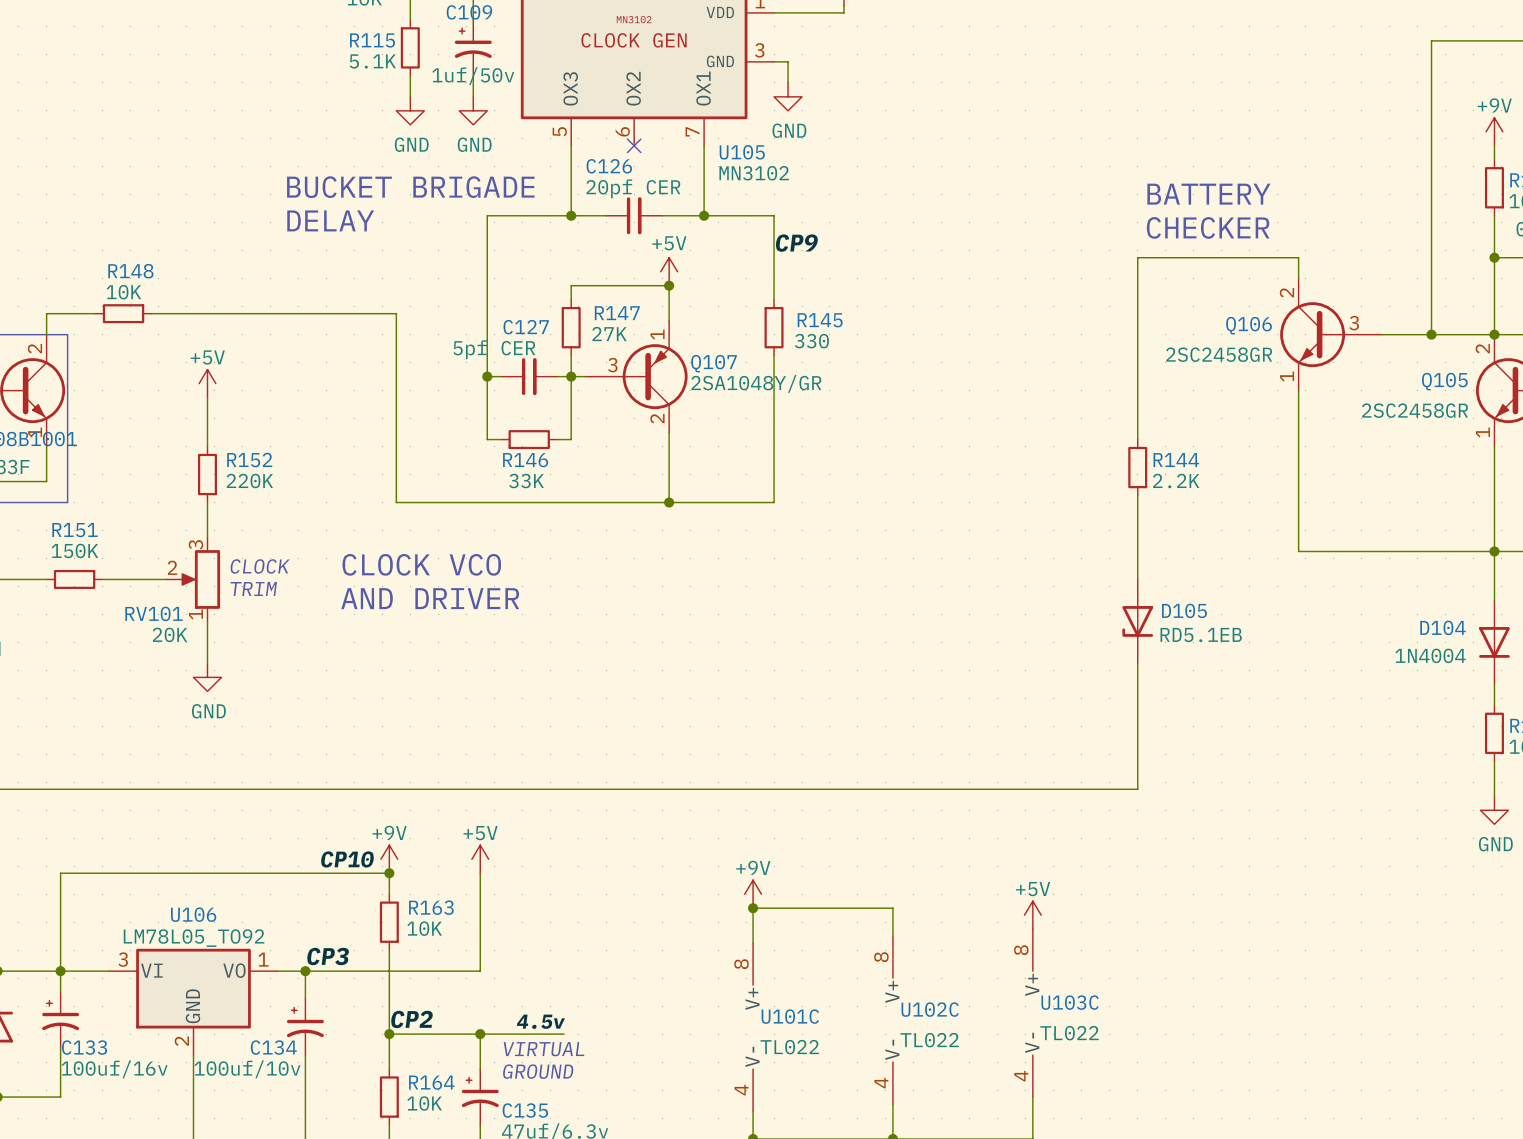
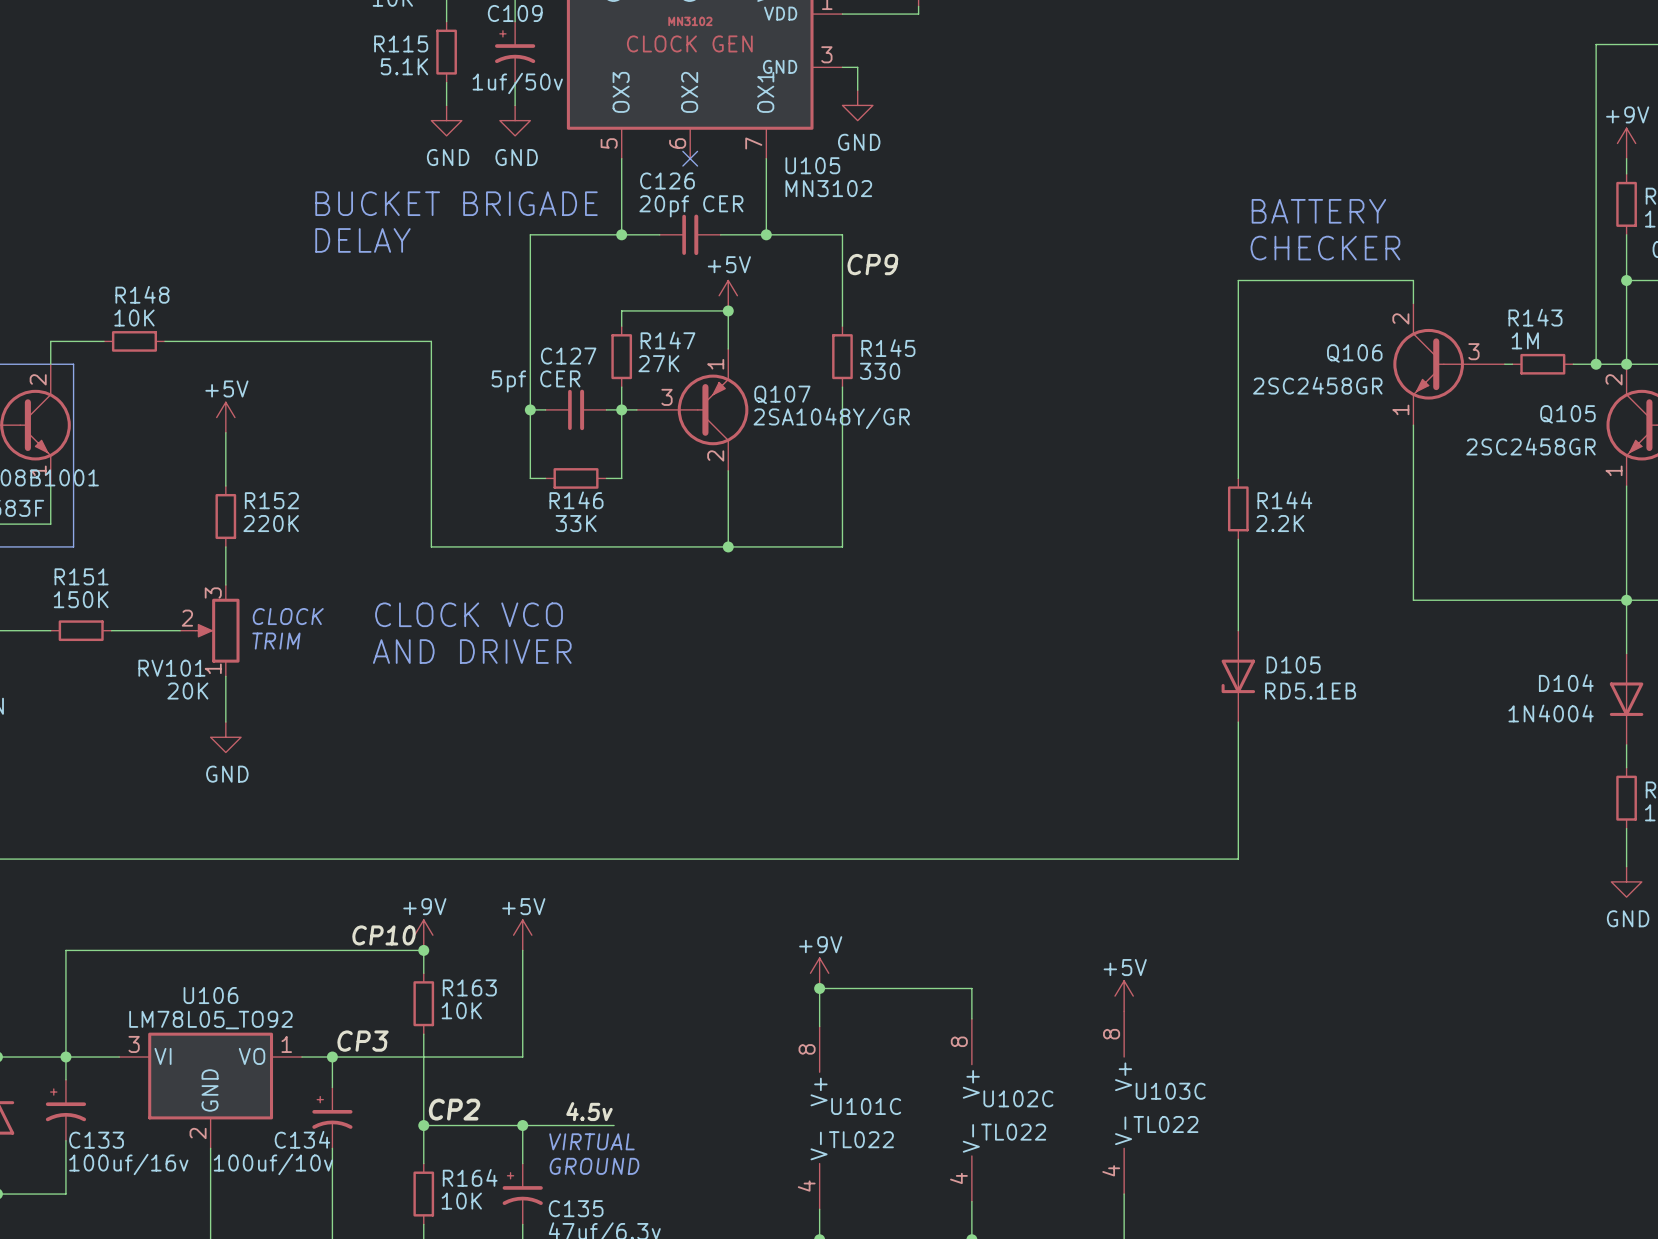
wire: (1466, 40) (1431, 40) (1431, 334) -> (1596, 44) (1596, 364)
wire: (1389, 334) (1445, 334) -> none
R143: none -> 1M (1542, 364)
junction position: (1431, 334) -> (1596, 364)

